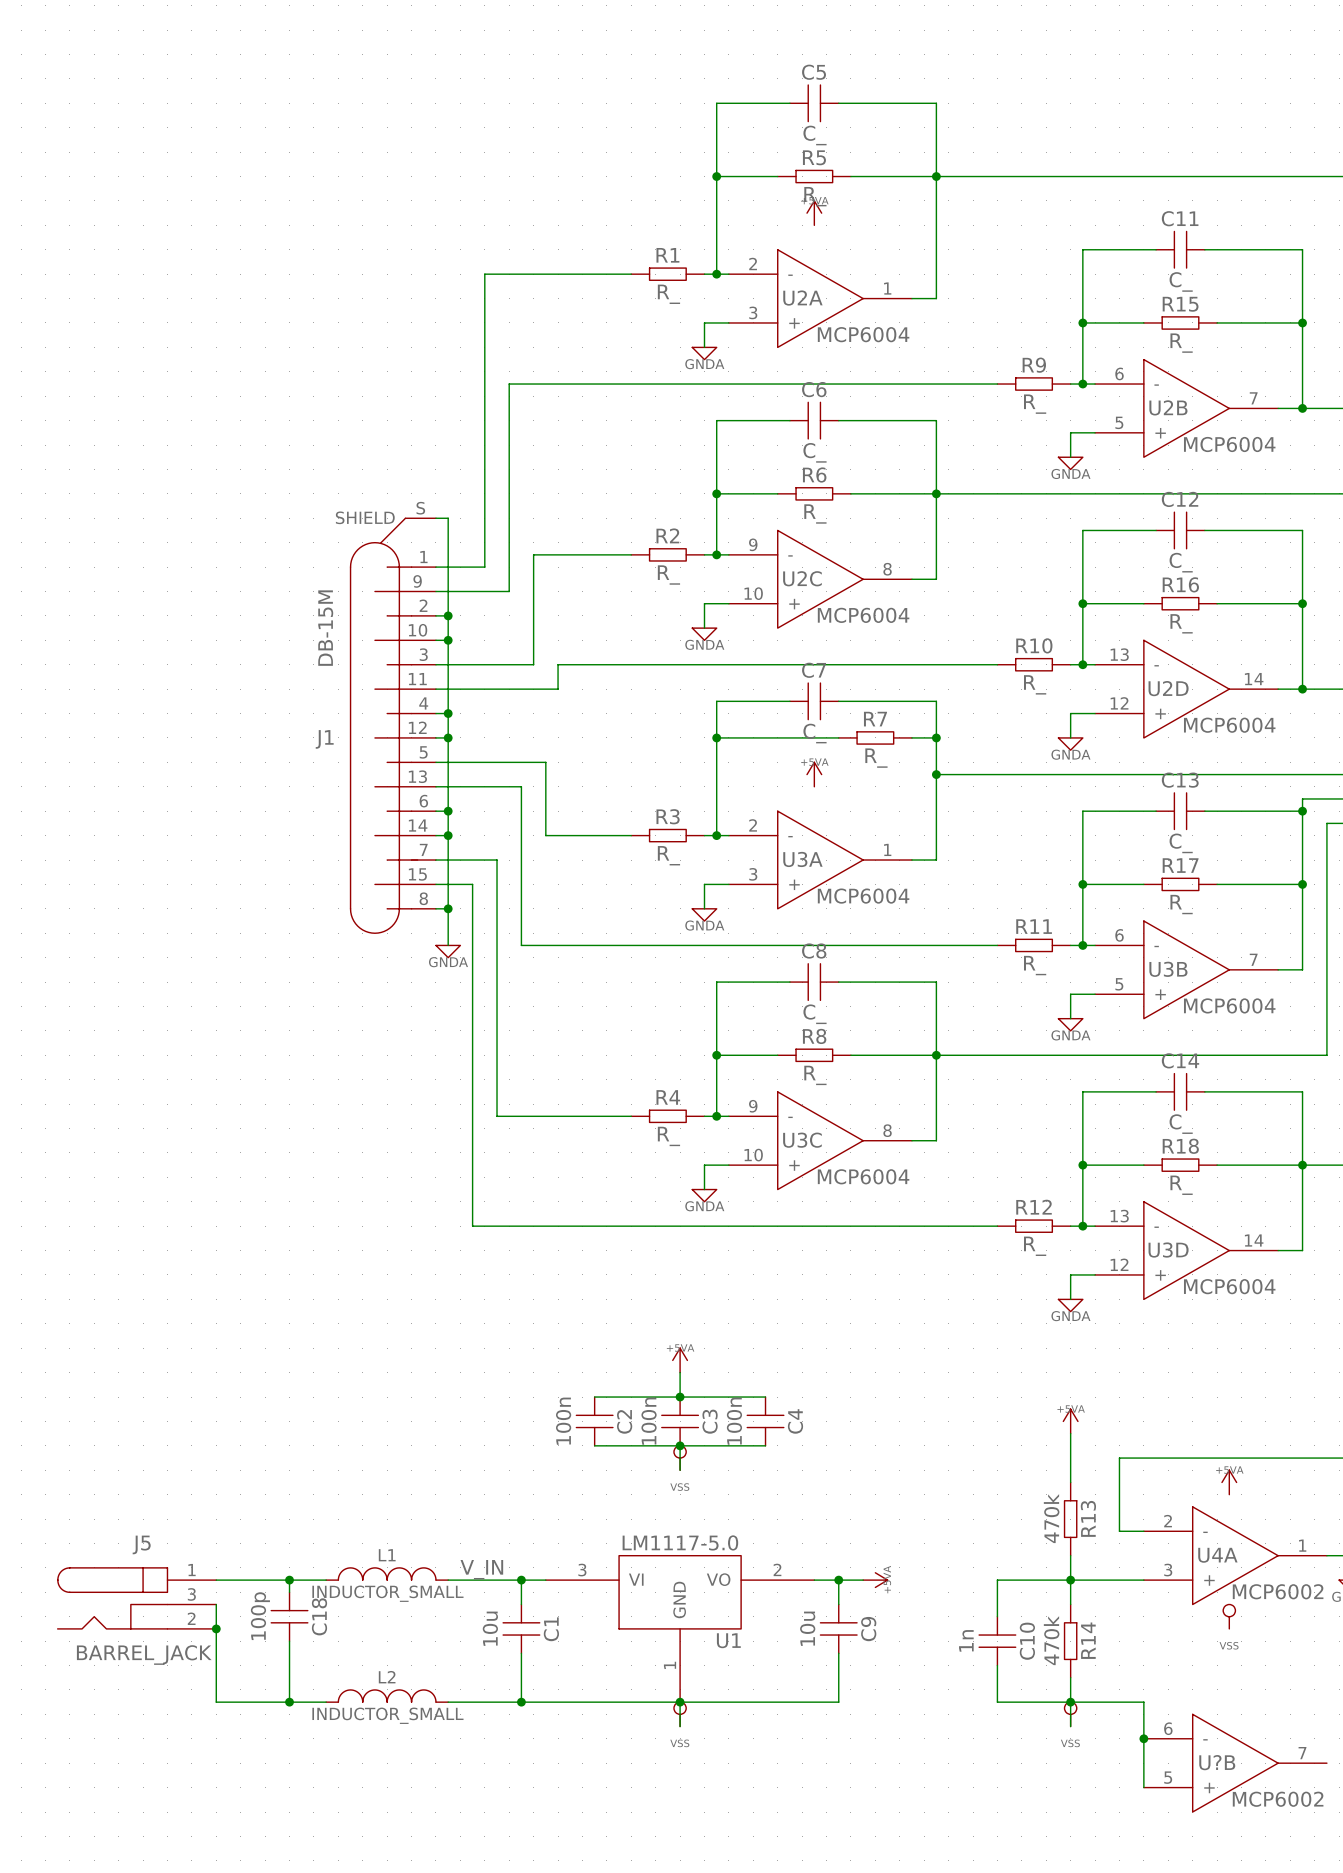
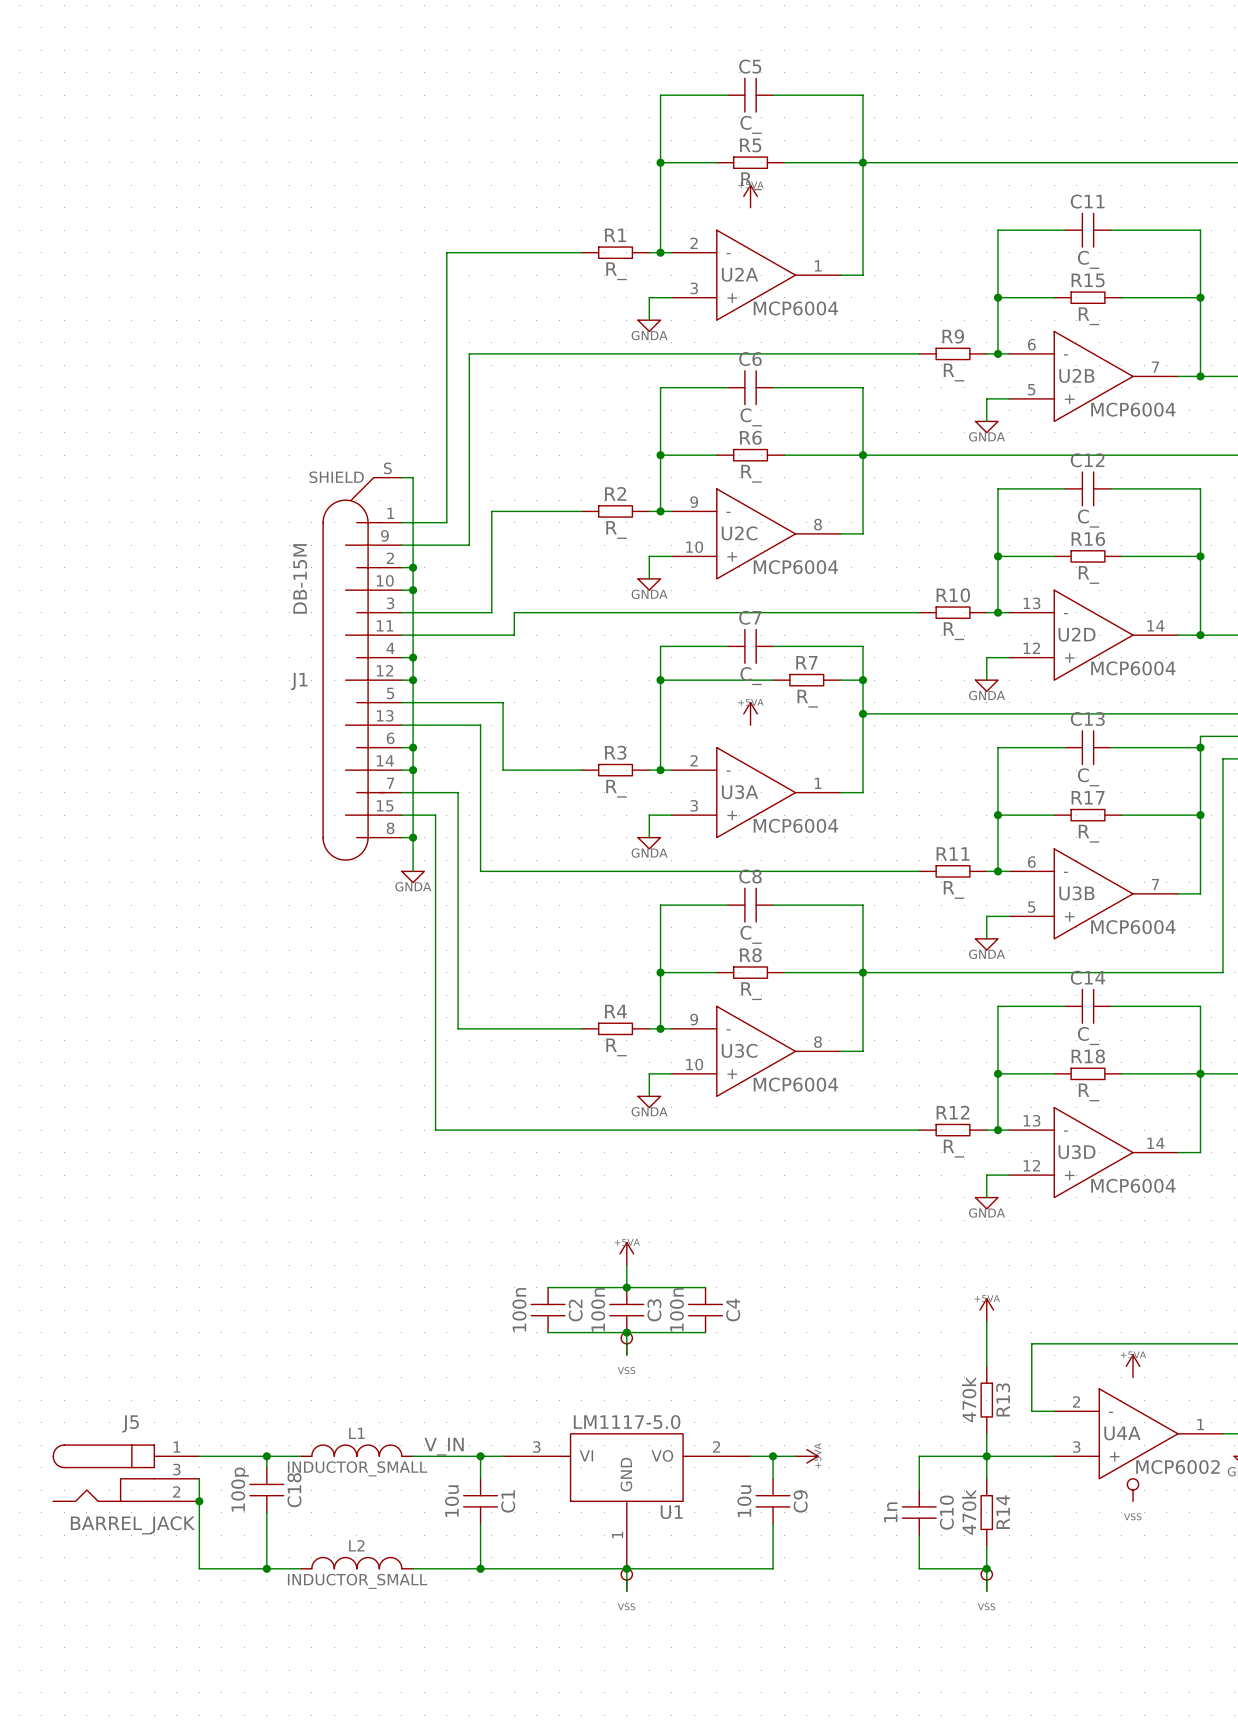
wire: (1070, 1702) (1143, 1702) (1143, 1787) -> none
junction: (1143, 1738) -> none
U?B: MCP6002 (1235, 1763) -> none

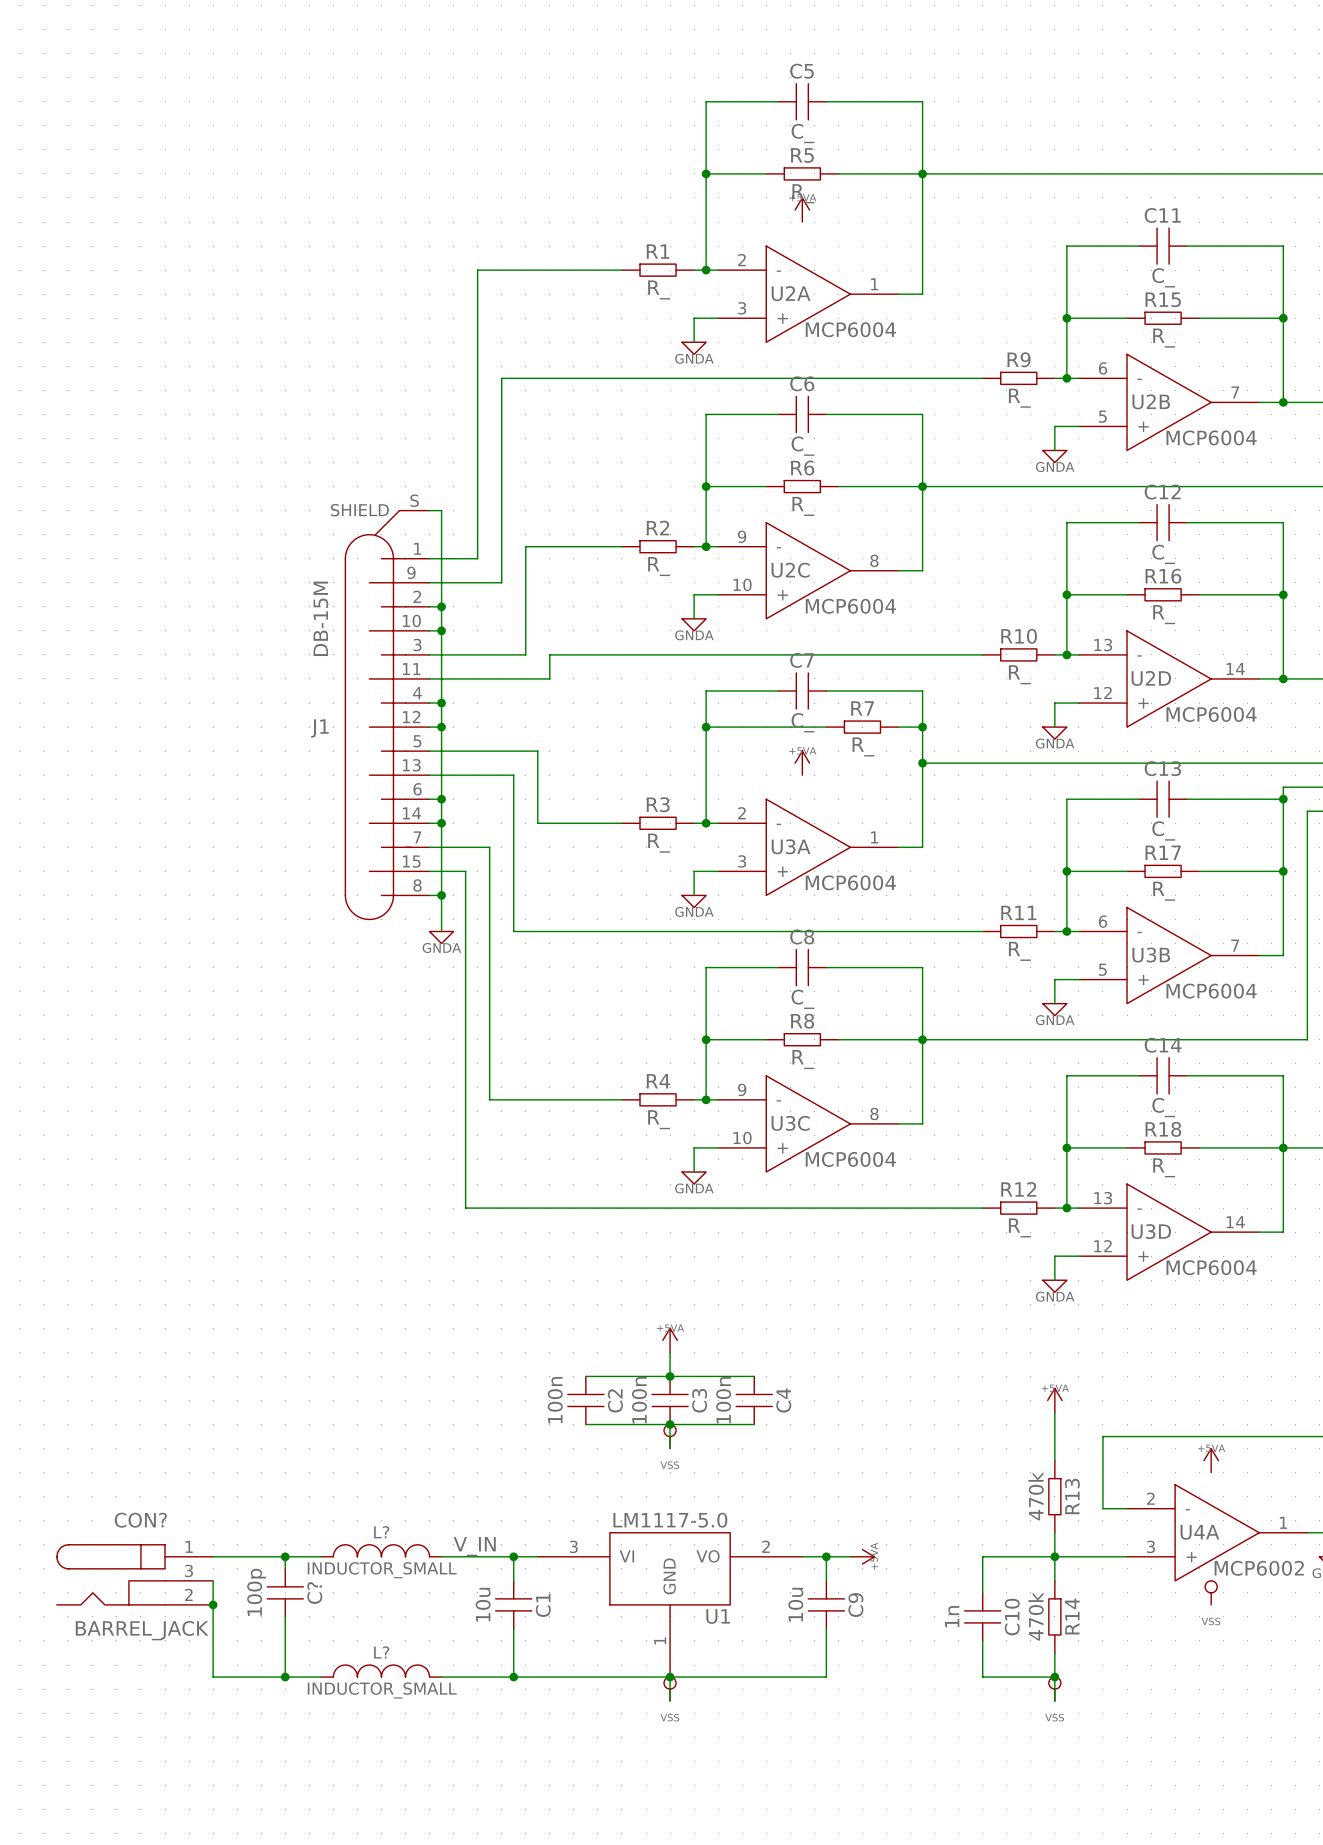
J5 name: J5 (130, 1423) -> CON? (140, 1520)
L1 name: L1 (356, 1433) -> L? (381, 1532)
C18 name: C18 (294, 1490) -> C? (314, 1593)
L2 name: L2 (356, 1545) -> L? (381, 1652)

